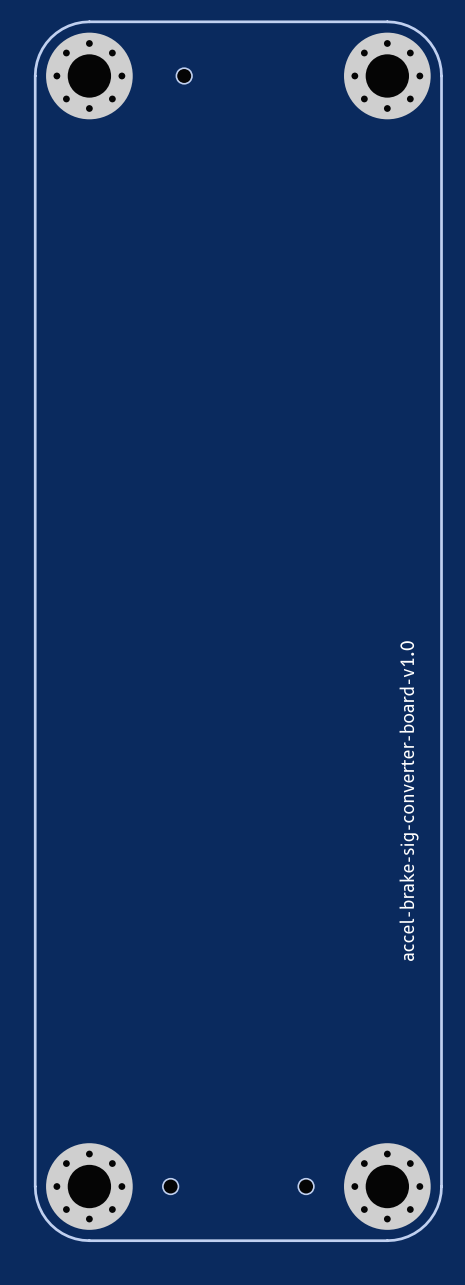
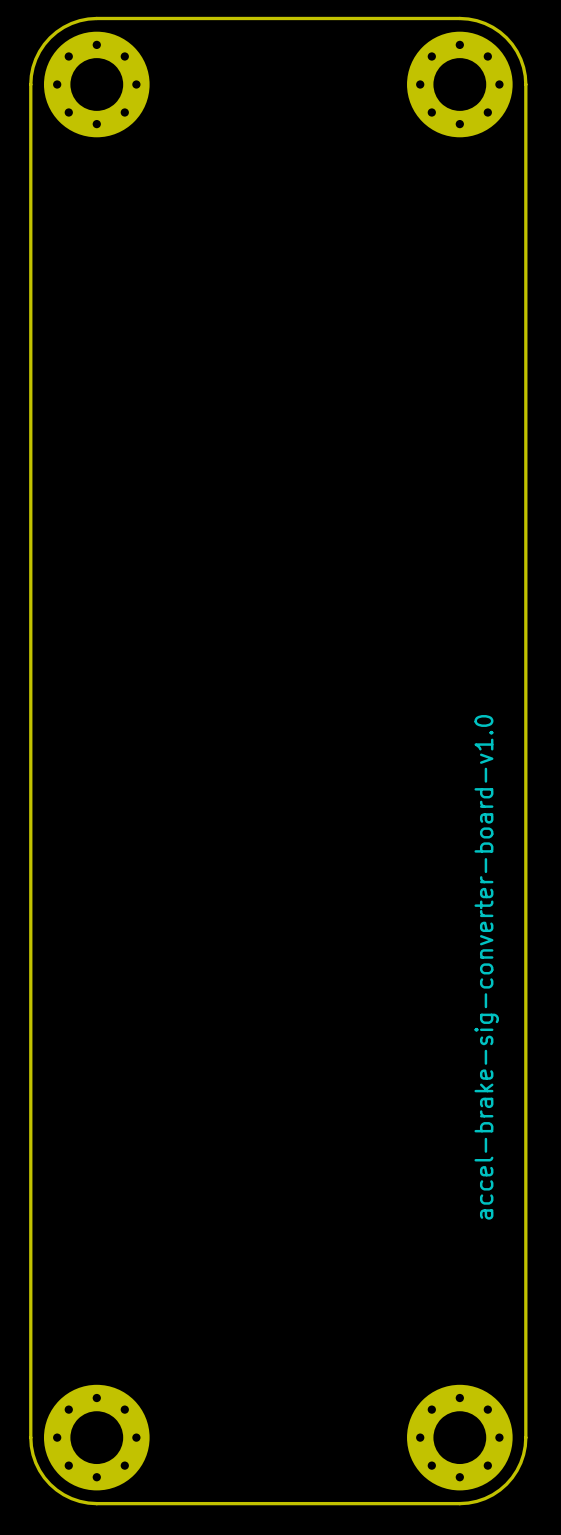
part: (184, 75) -> none
part: (170, 1186) -> none
part: (306, 1186) -> none

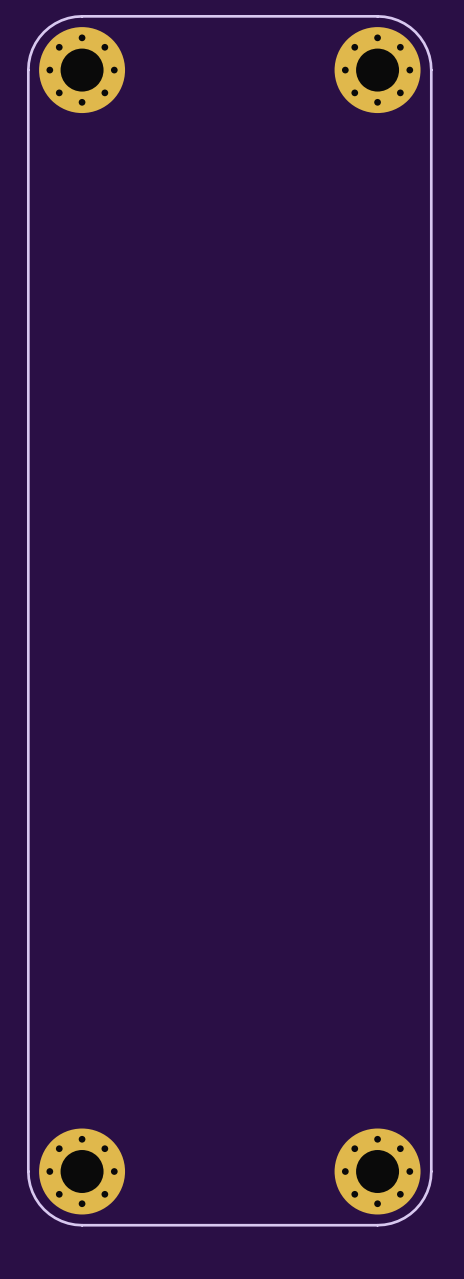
text: accel-brake-sig-converter-board-v1.0 (486, 967) -> none

